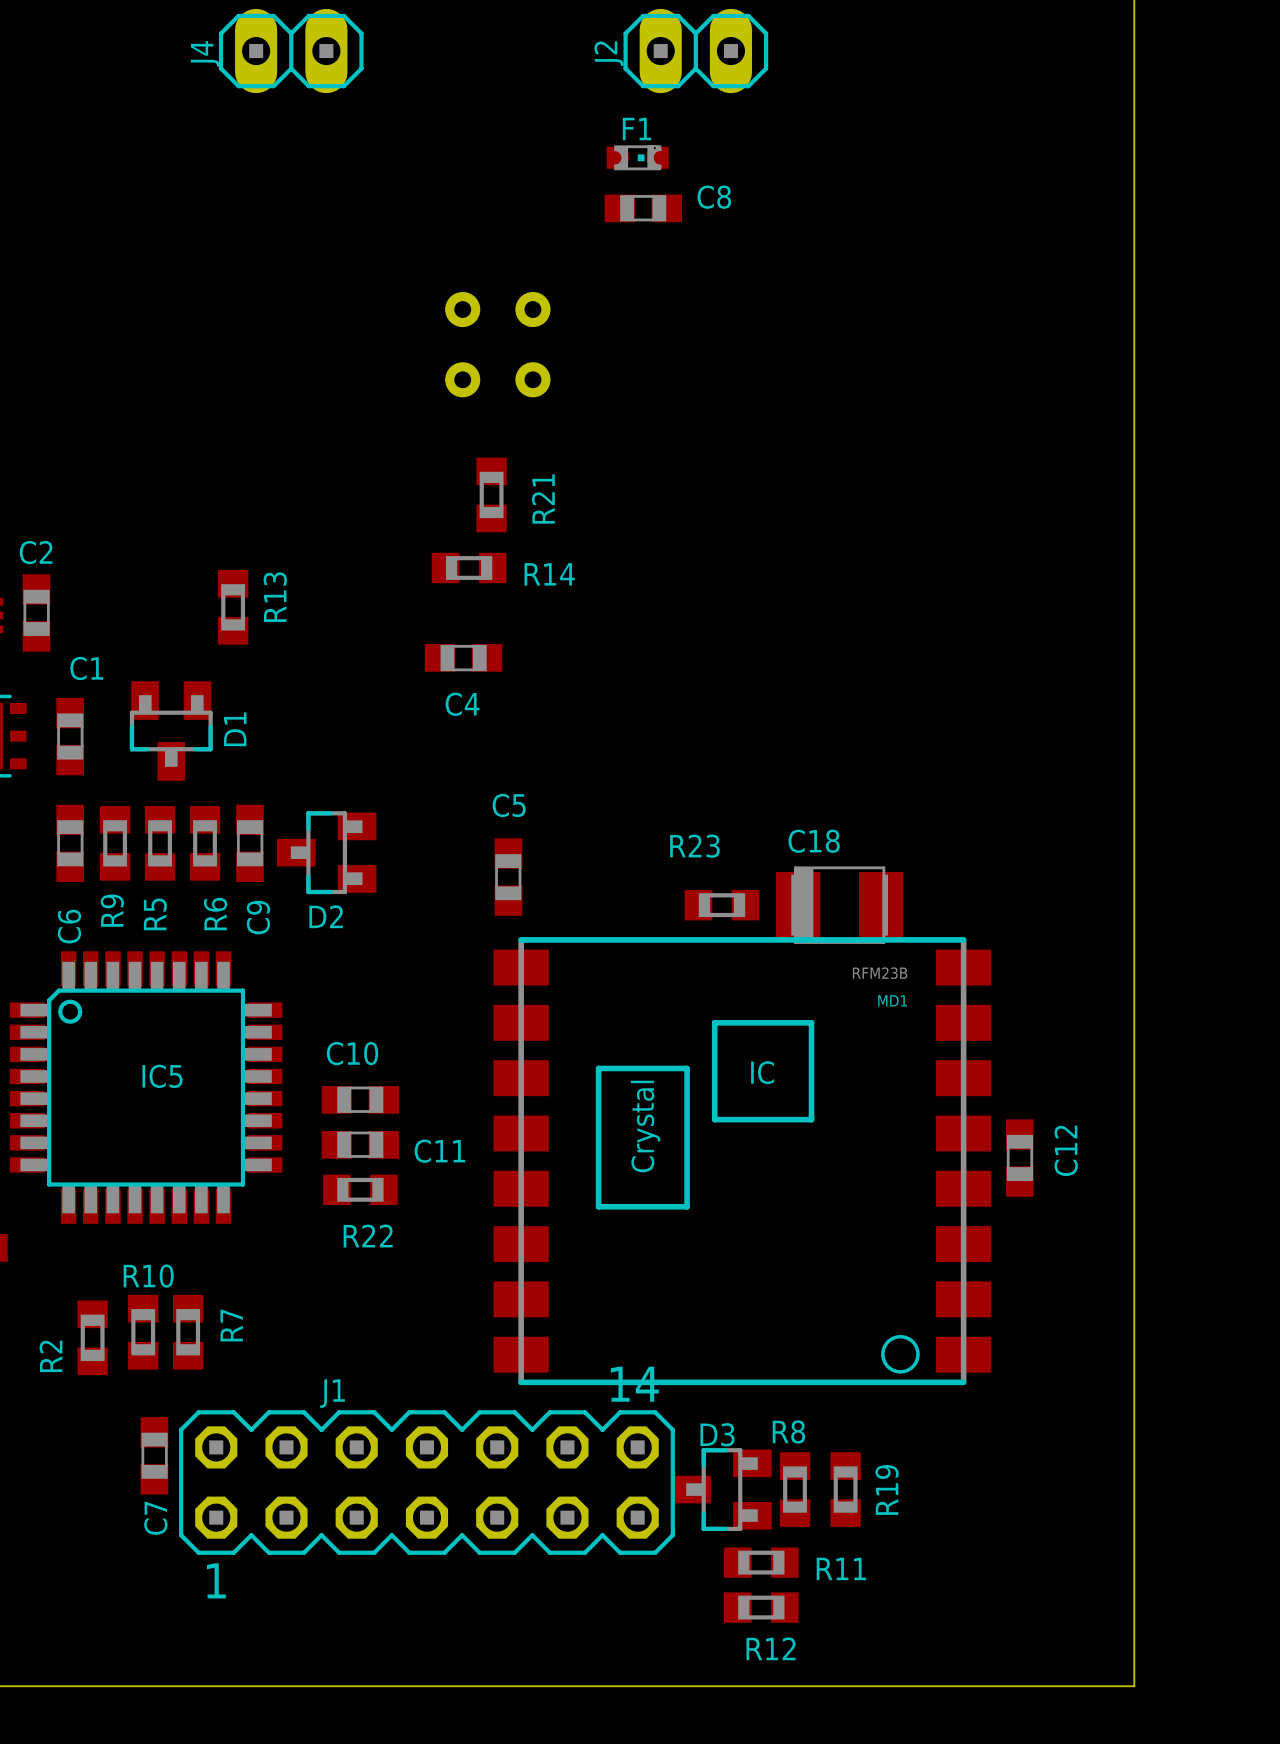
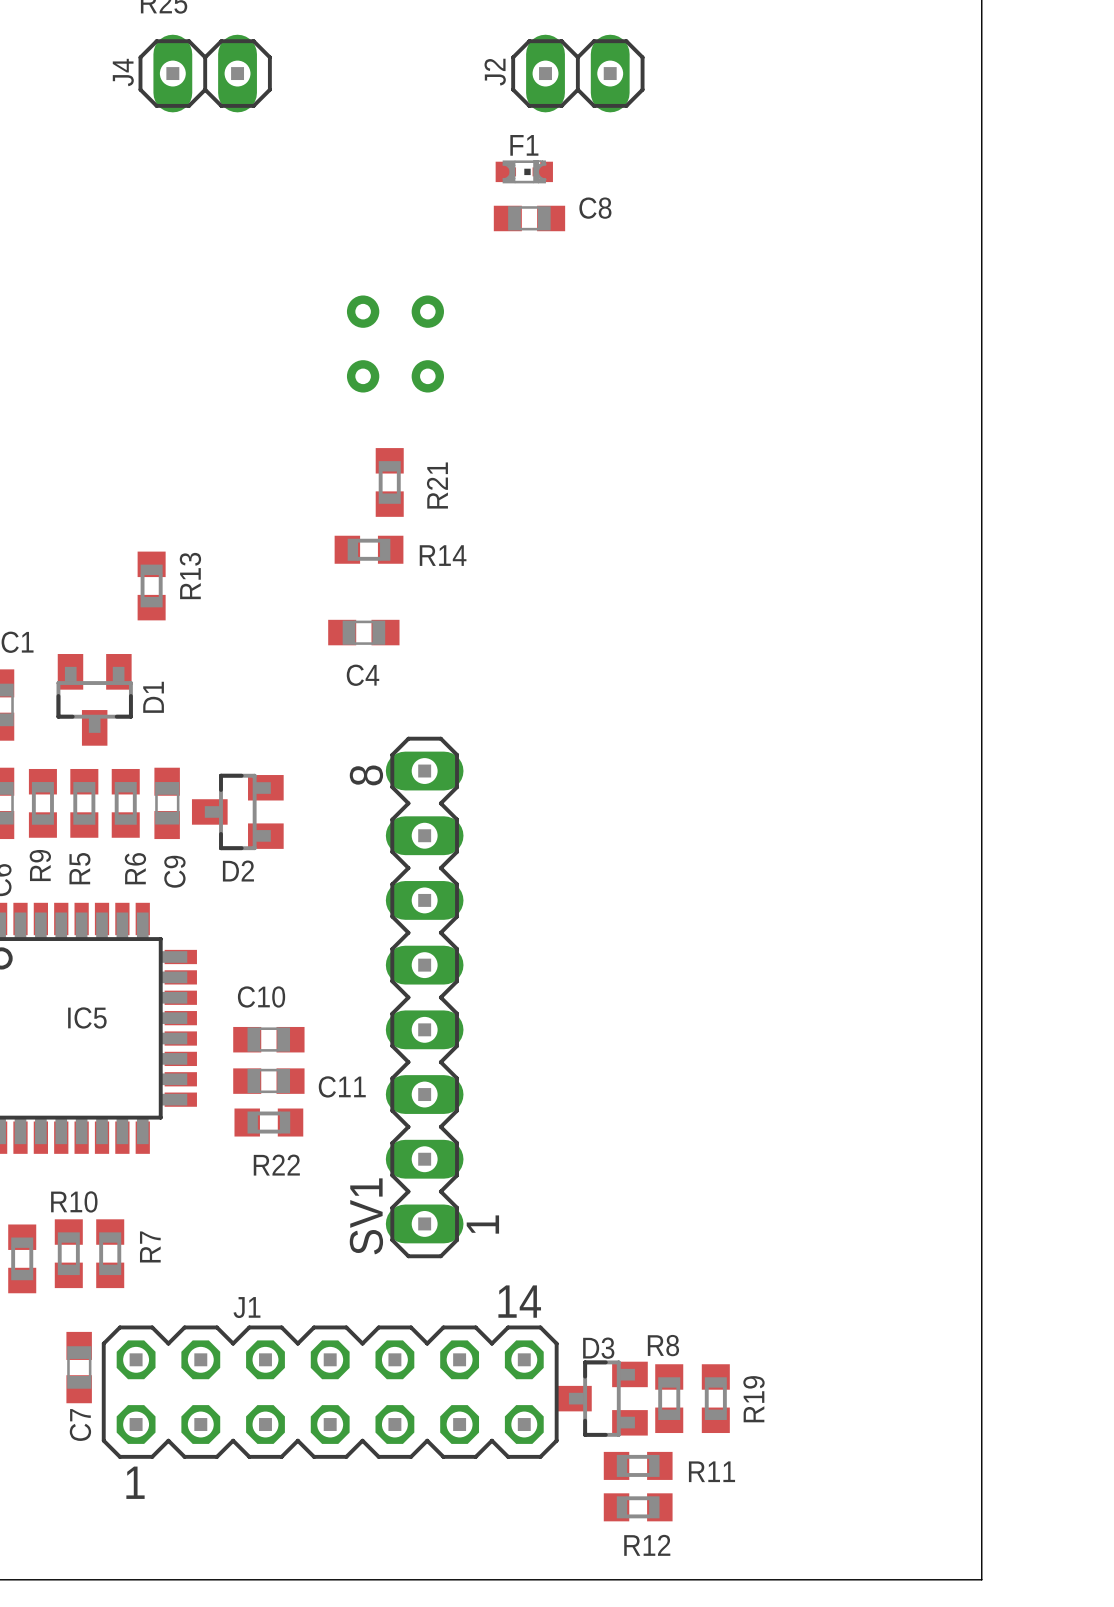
C5: (508, 877) -> none
R23: (721, 905) -> none
C18: (839, 905) -> none
SV1: none -> (424, 997)
C12: (1019, 1158) -> none
MD1: RFM23B (742, 1161) -> none

